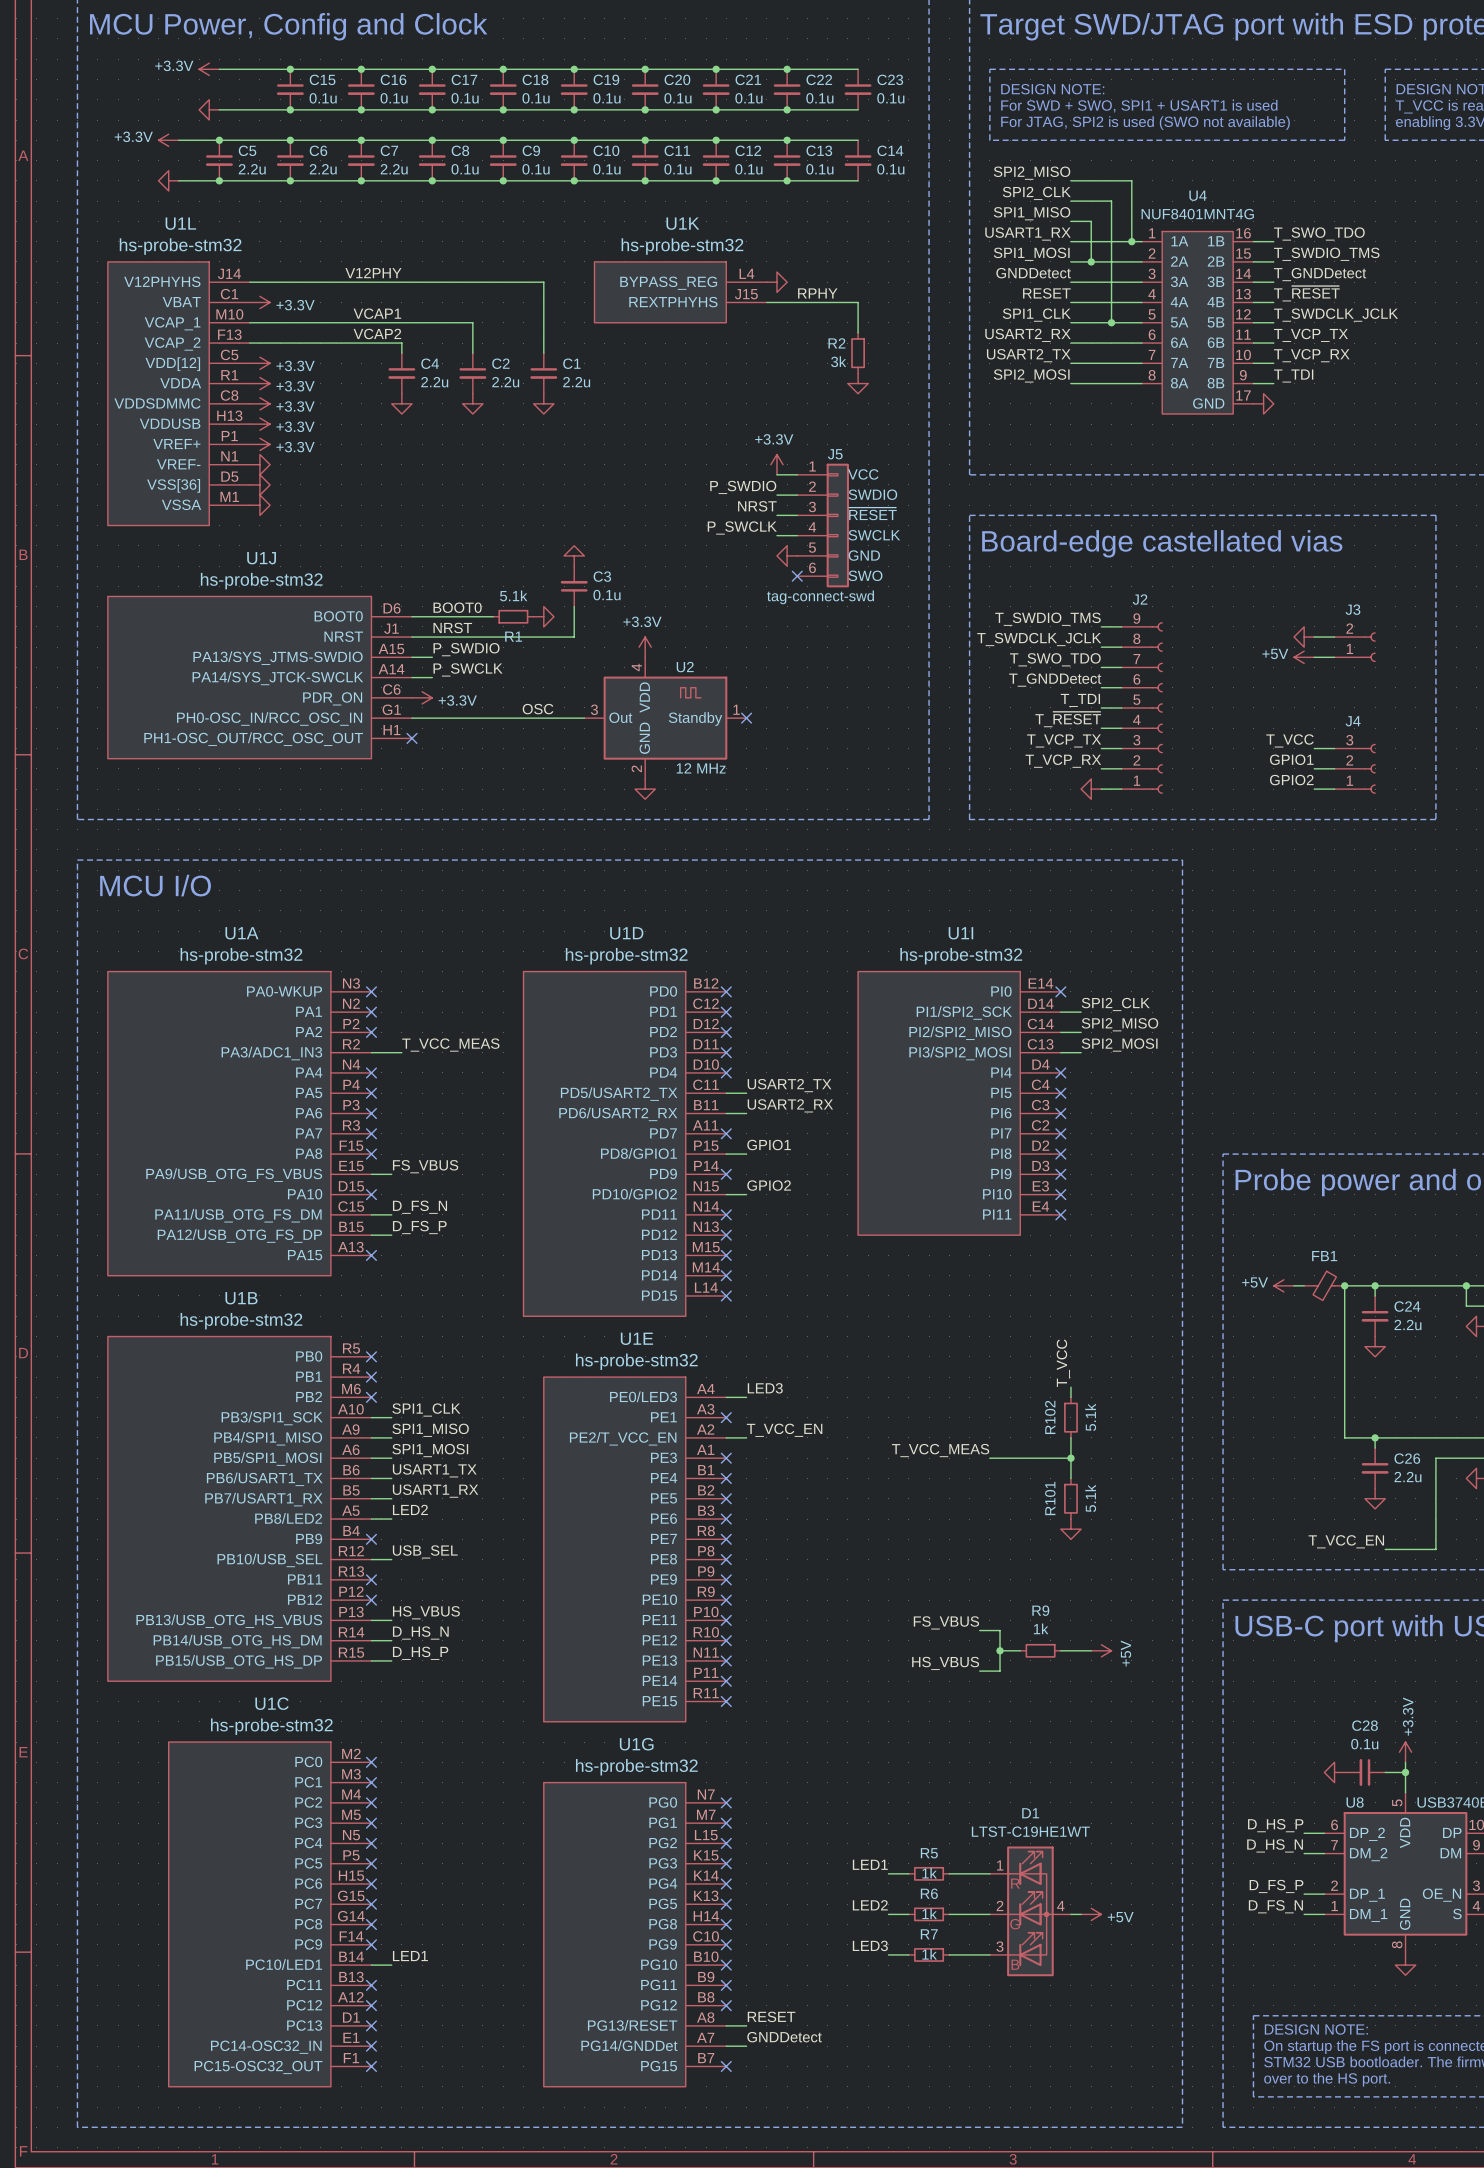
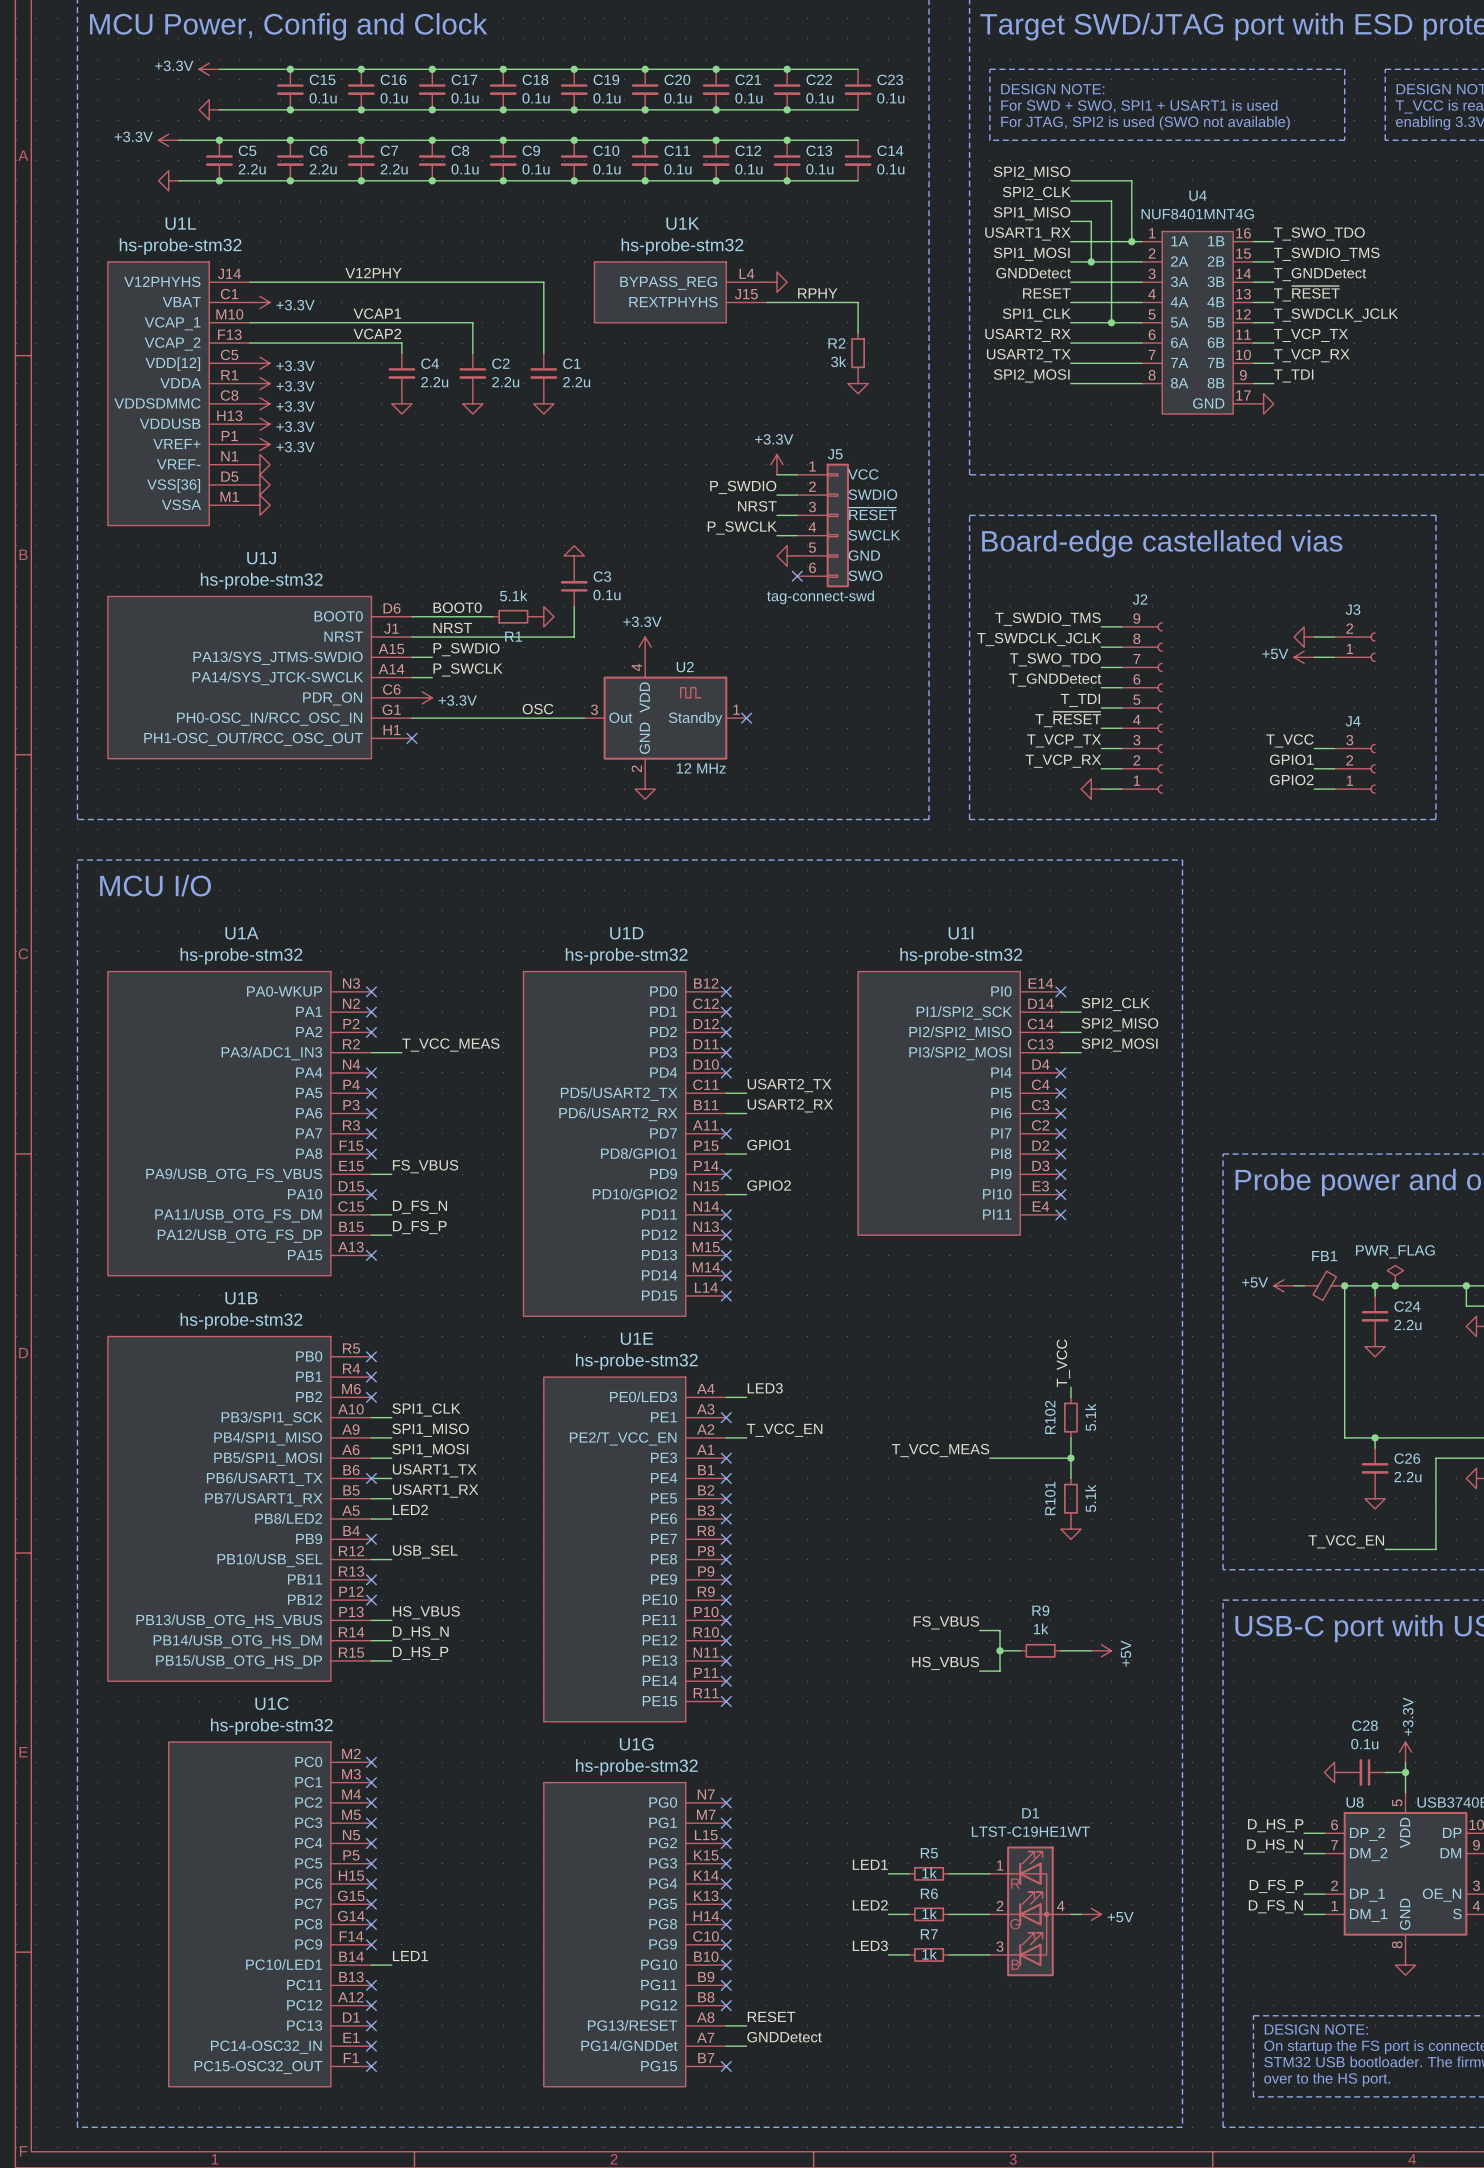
power symbol: none -> PWR_FLAG (1395, 1275)
junction: none -> (1395, 1285)
no-connect mark: none -> (371, 1478)

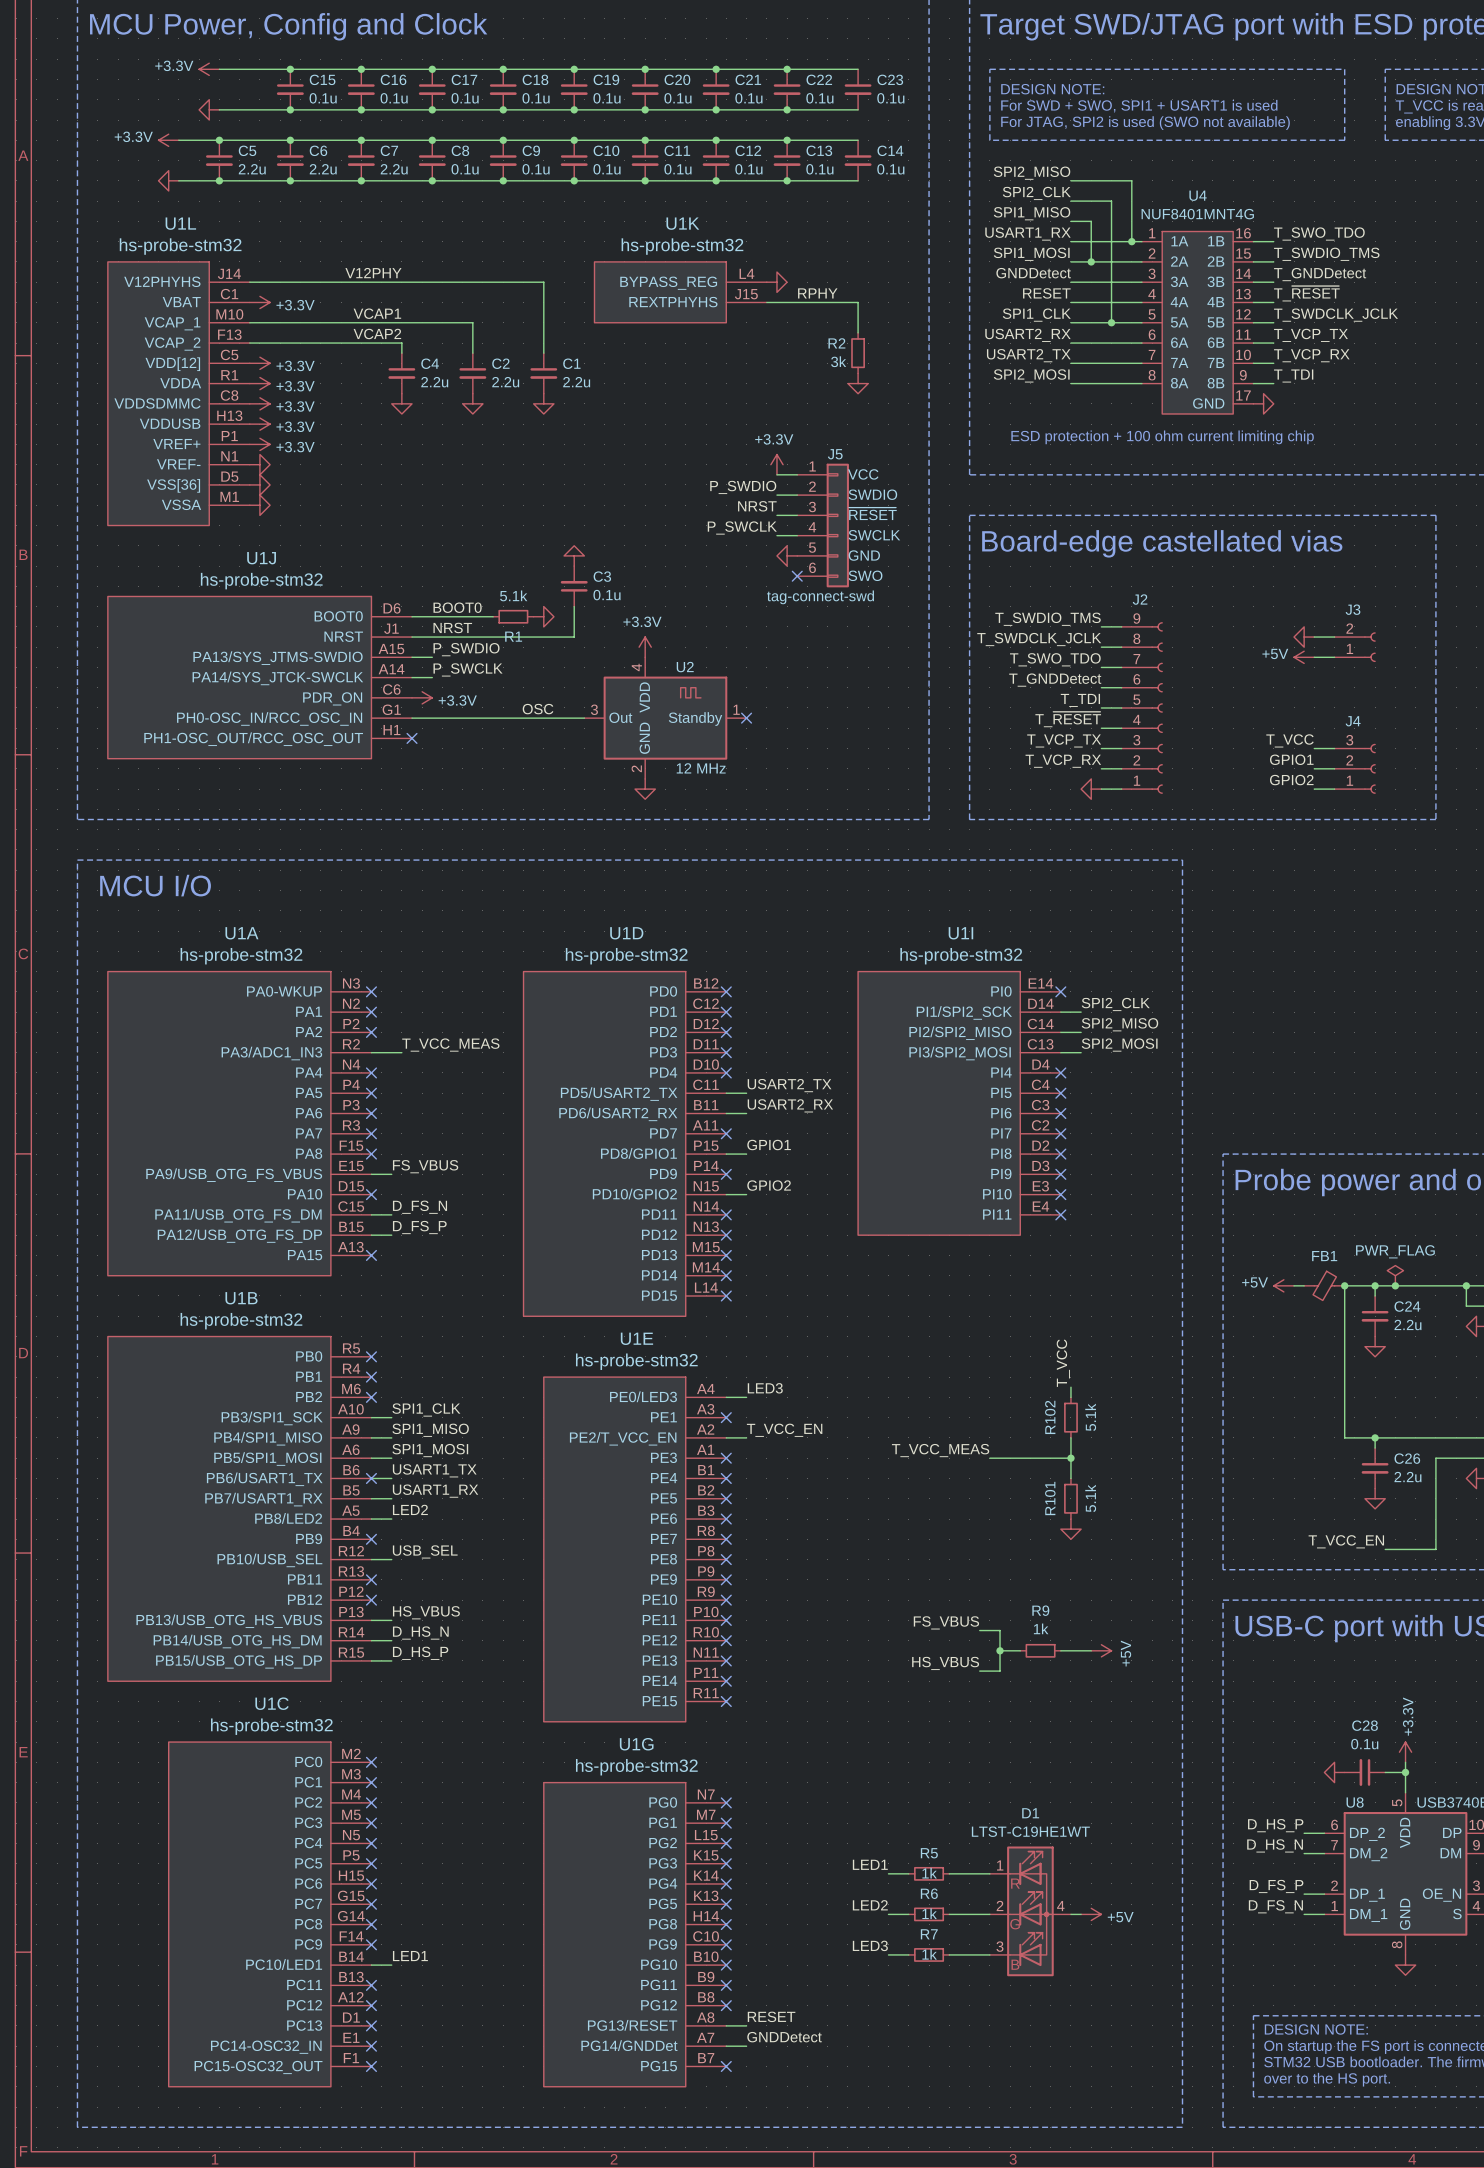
text: none -> ESD protection + 100 ohm current limiting chip (1162, 437)

